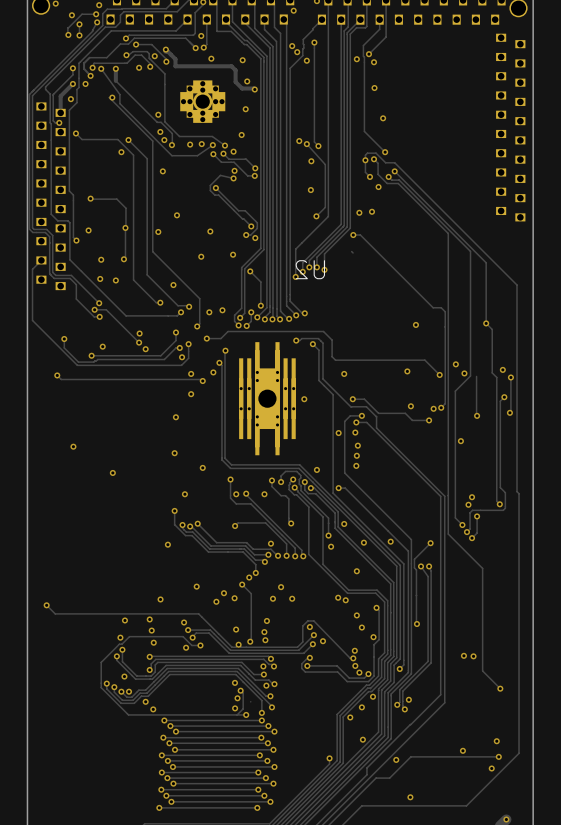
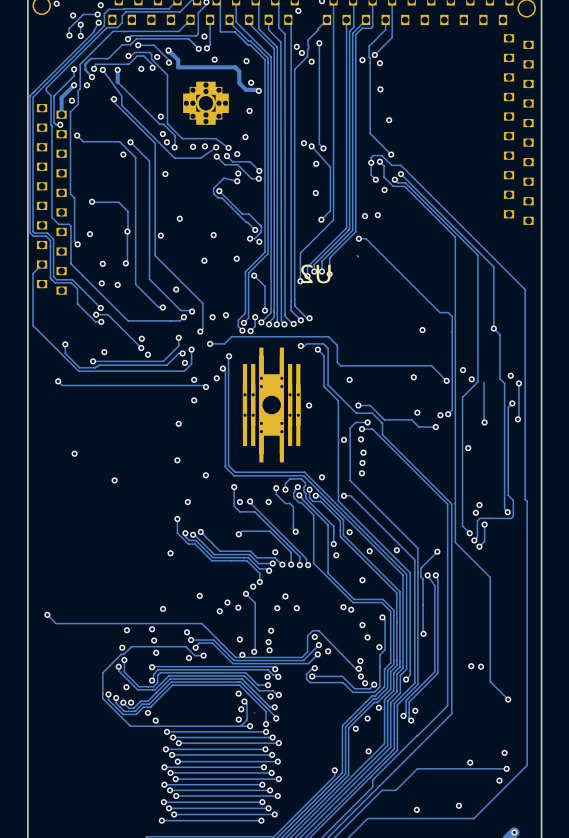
via: (396, 759) -> none
via: none -> (458, 805)

